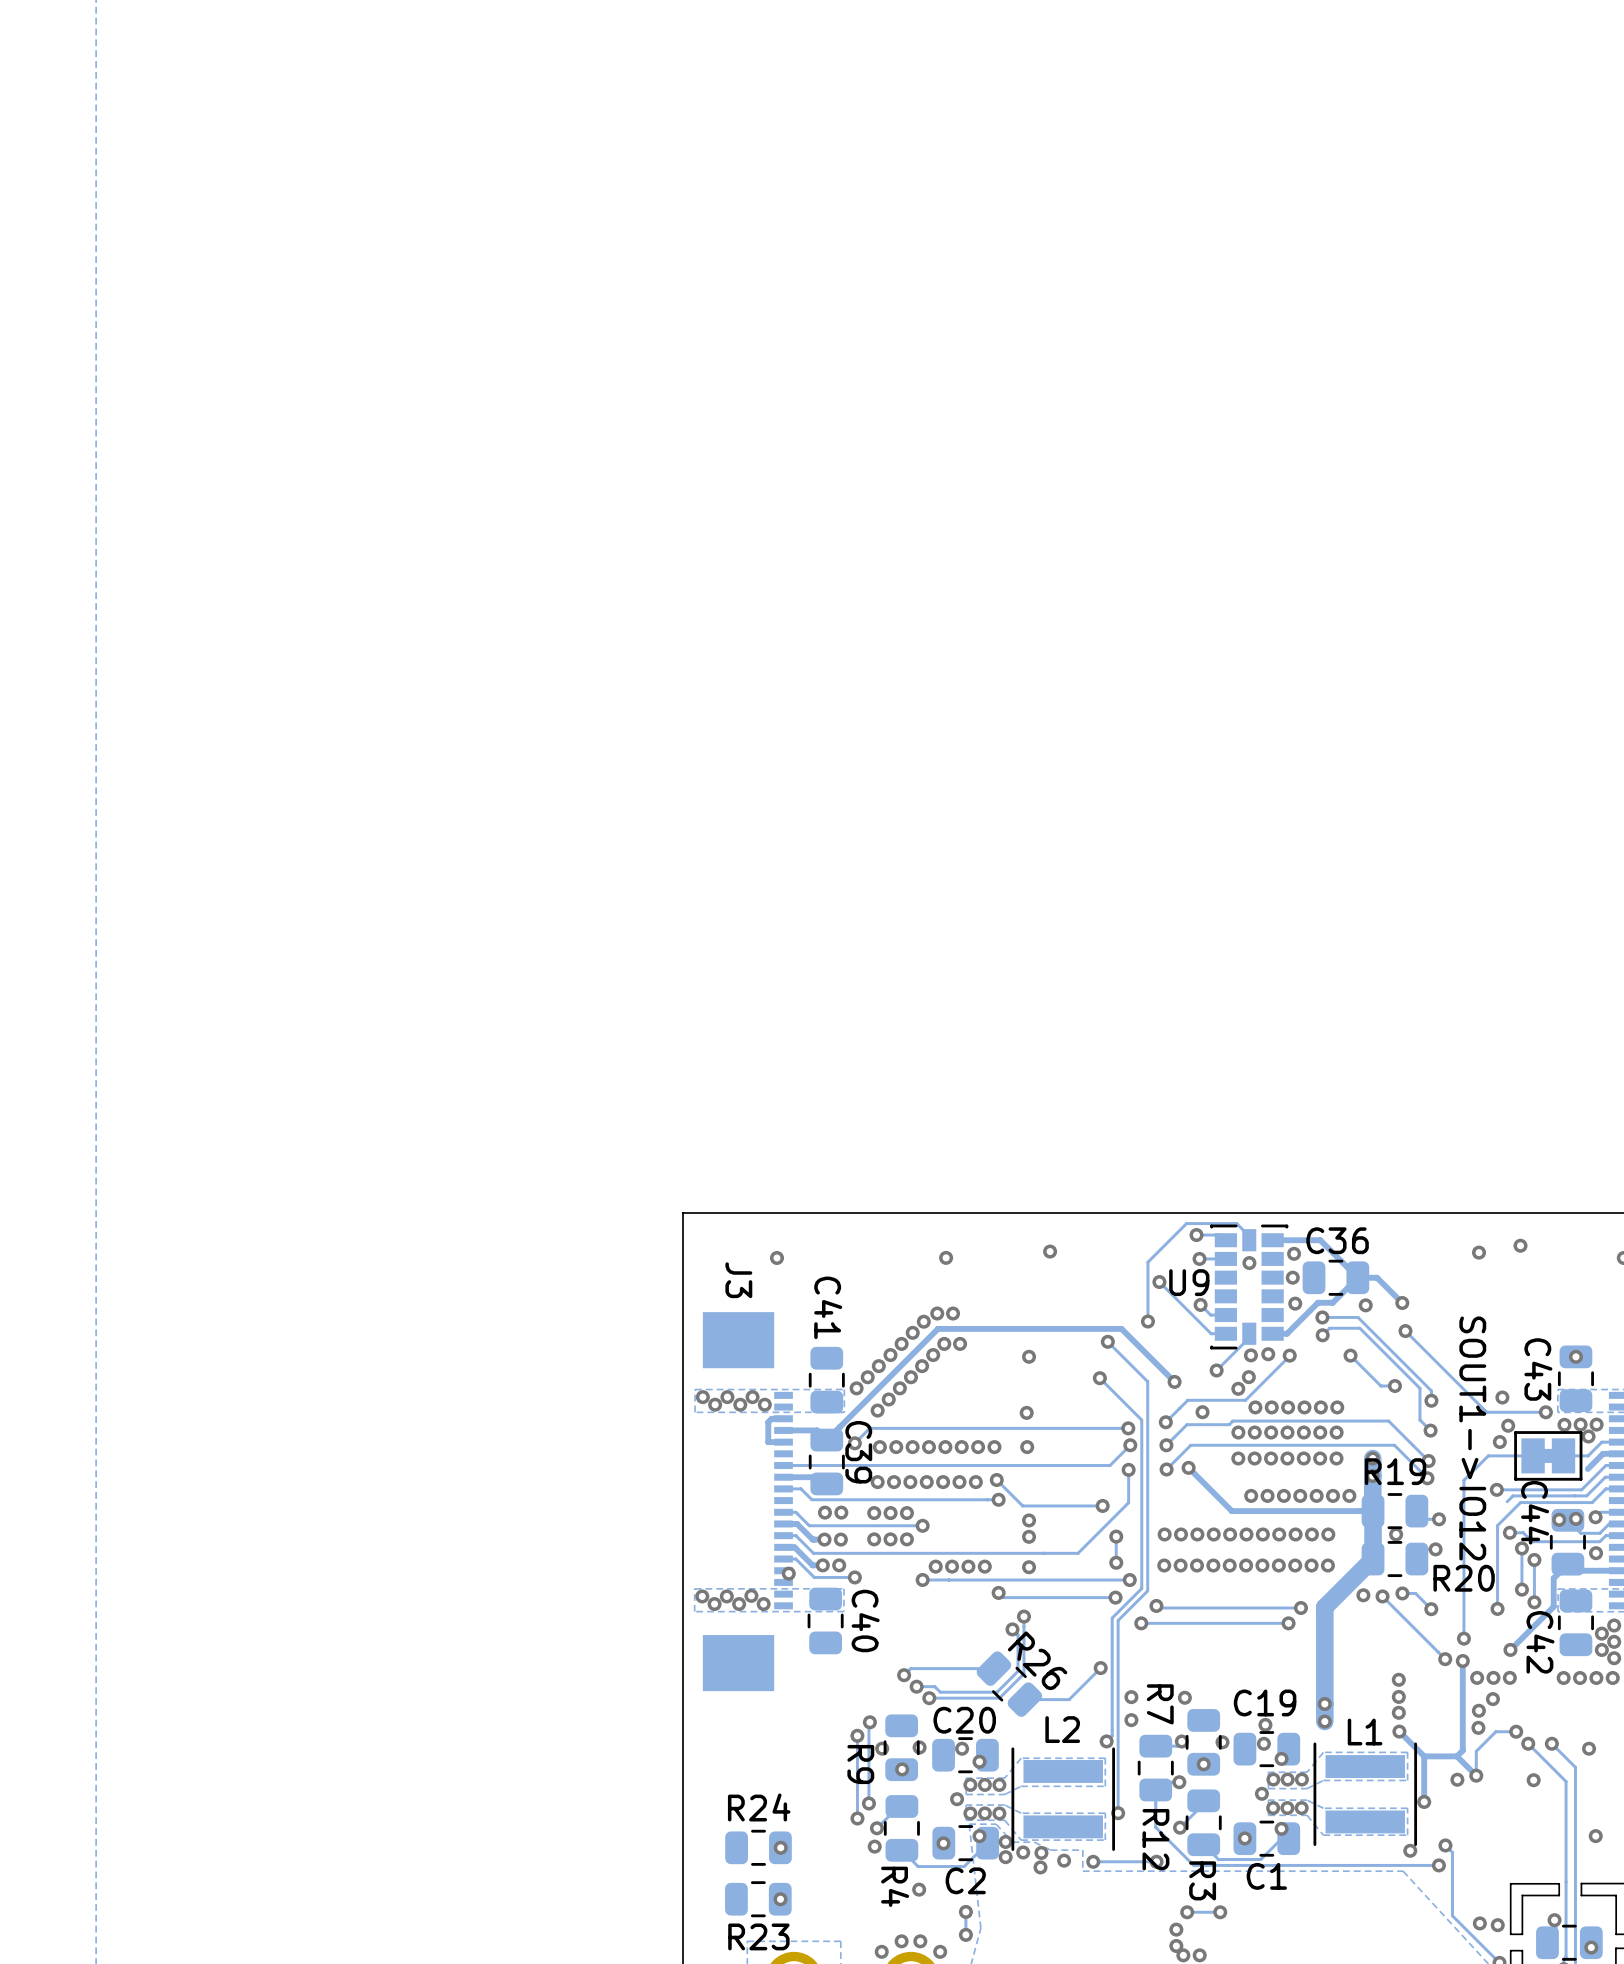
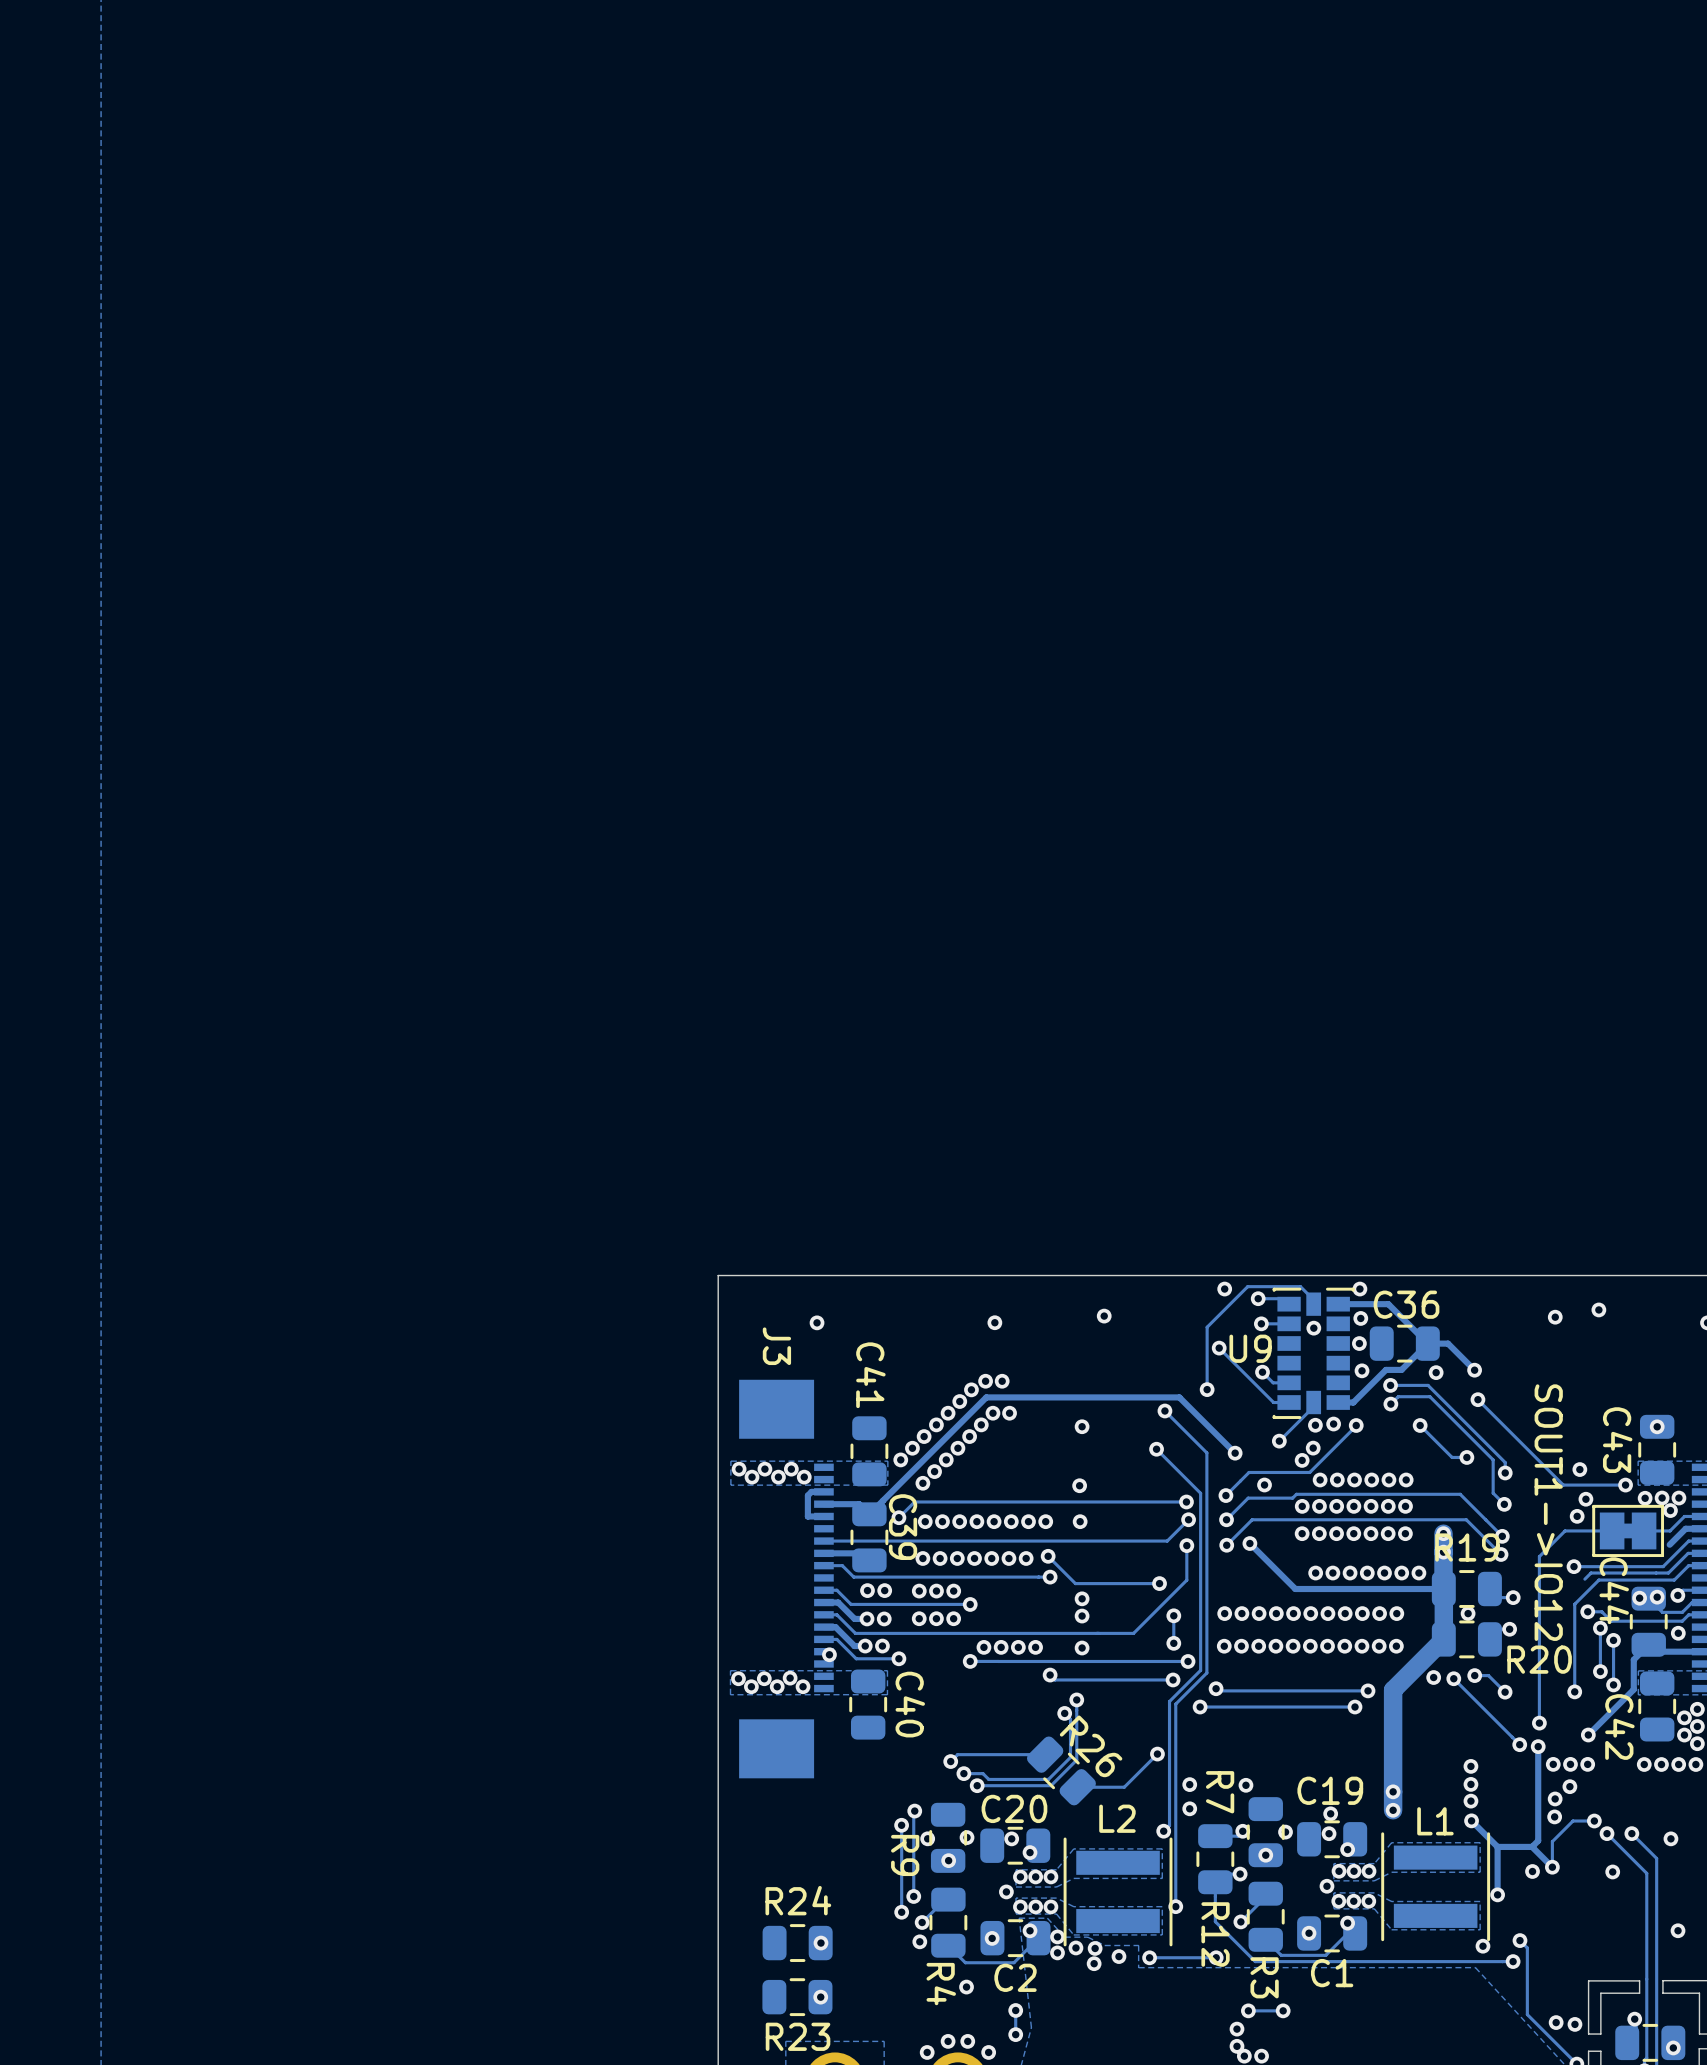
via: none -> (1224, 1289)
via: none -> (1359, 1289)

